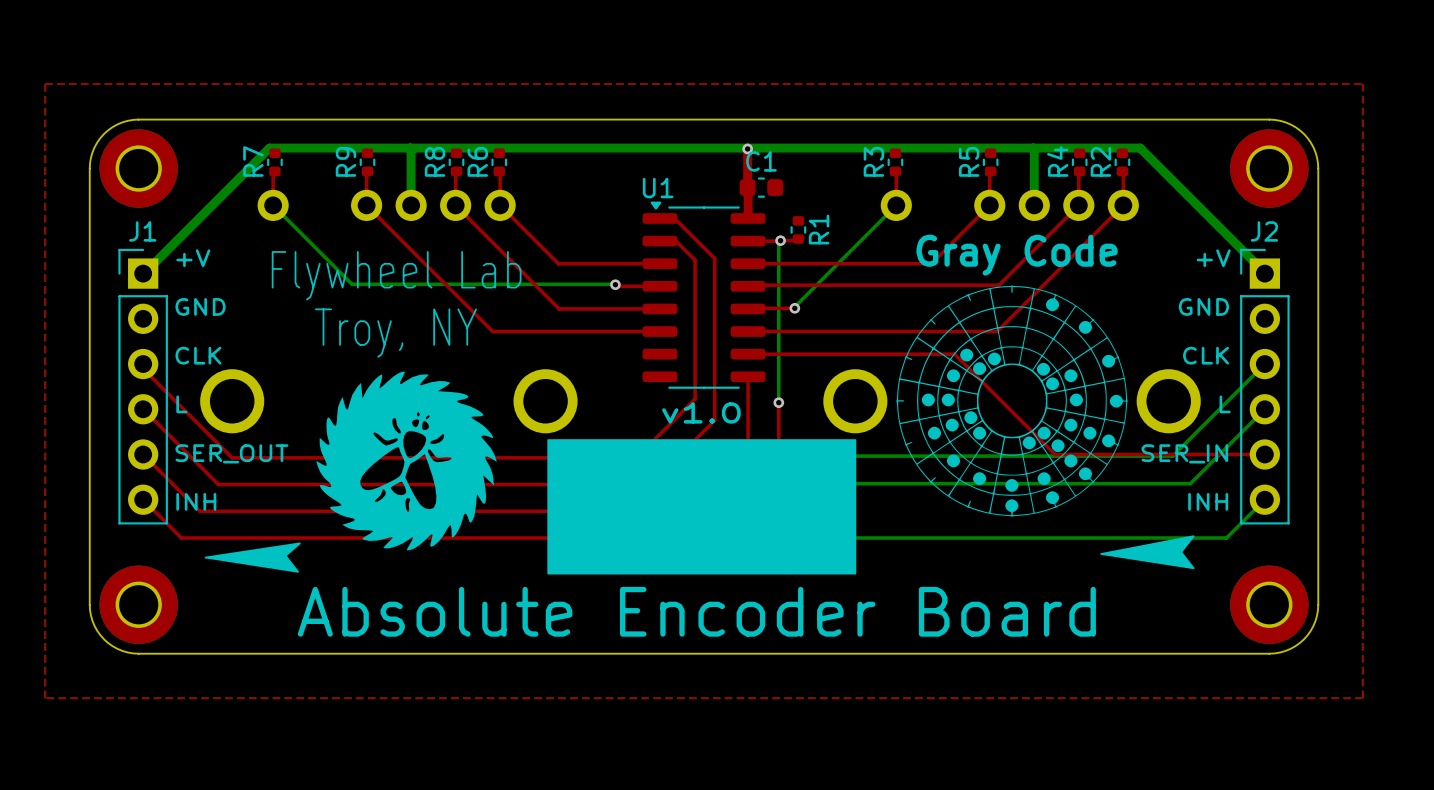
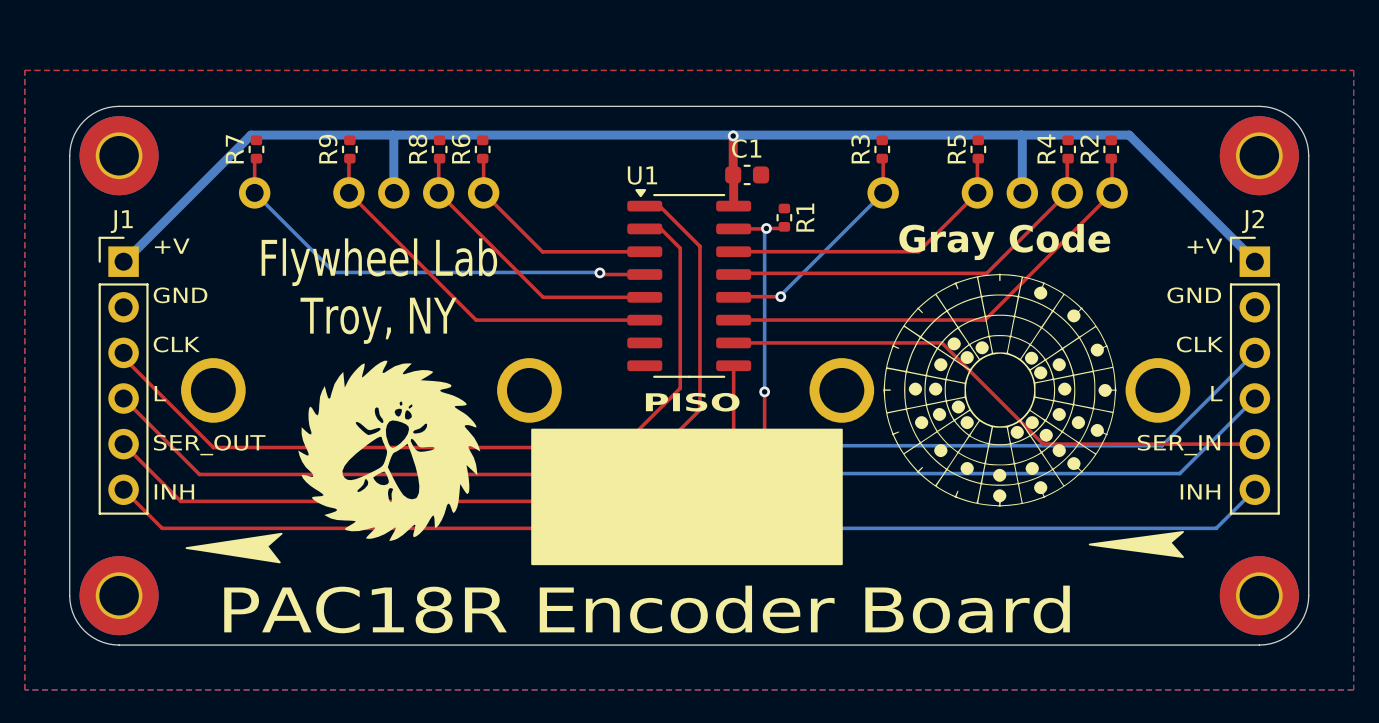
text: v1.0 (701, 412) -> PISO (692, 402)
drawing shape: [1100, 535, 1195, 570] -> [1088, 531, 1184, 558]
text: Absolute Encoder Board (696, 611) -> PAC18R Encoder Board (647, 609)

